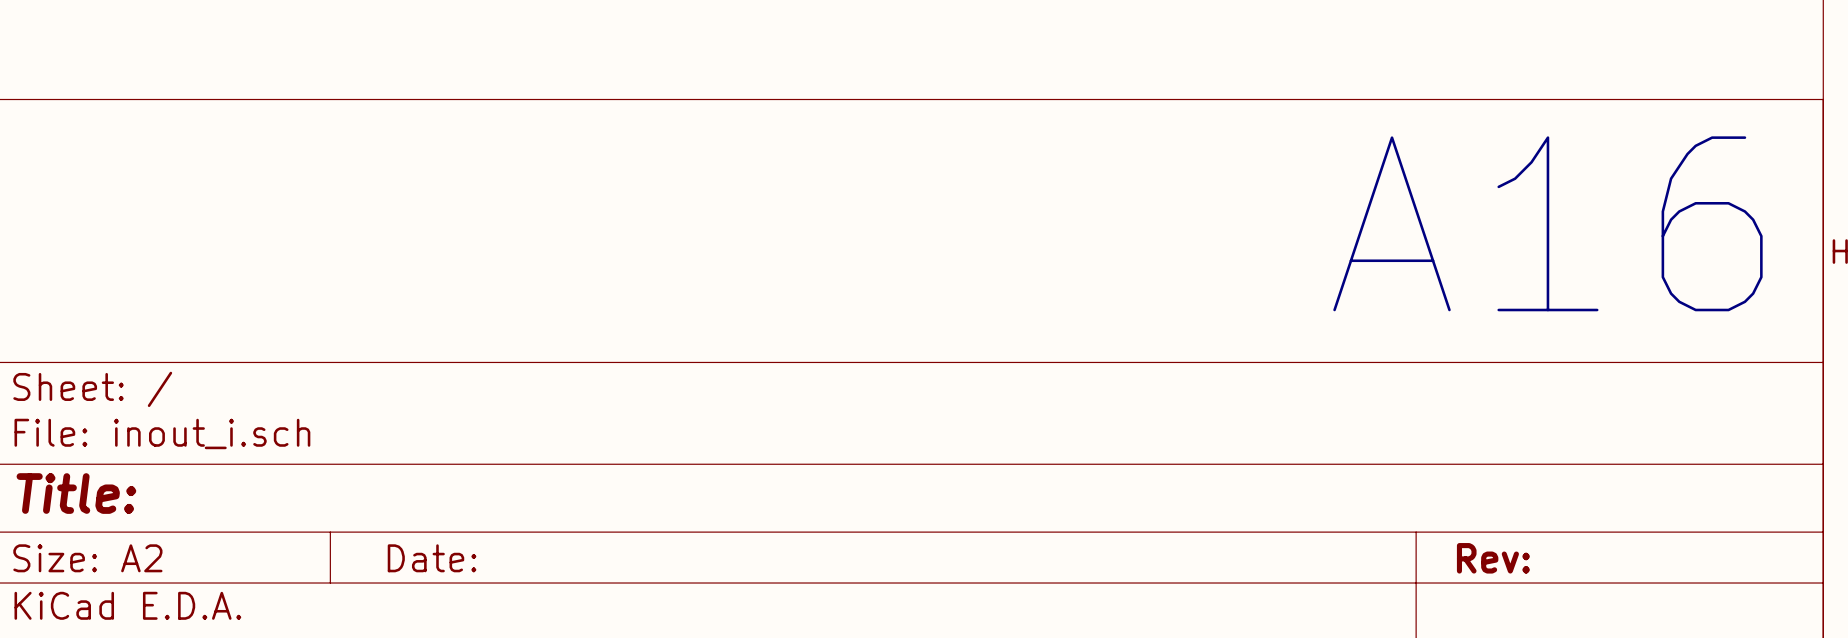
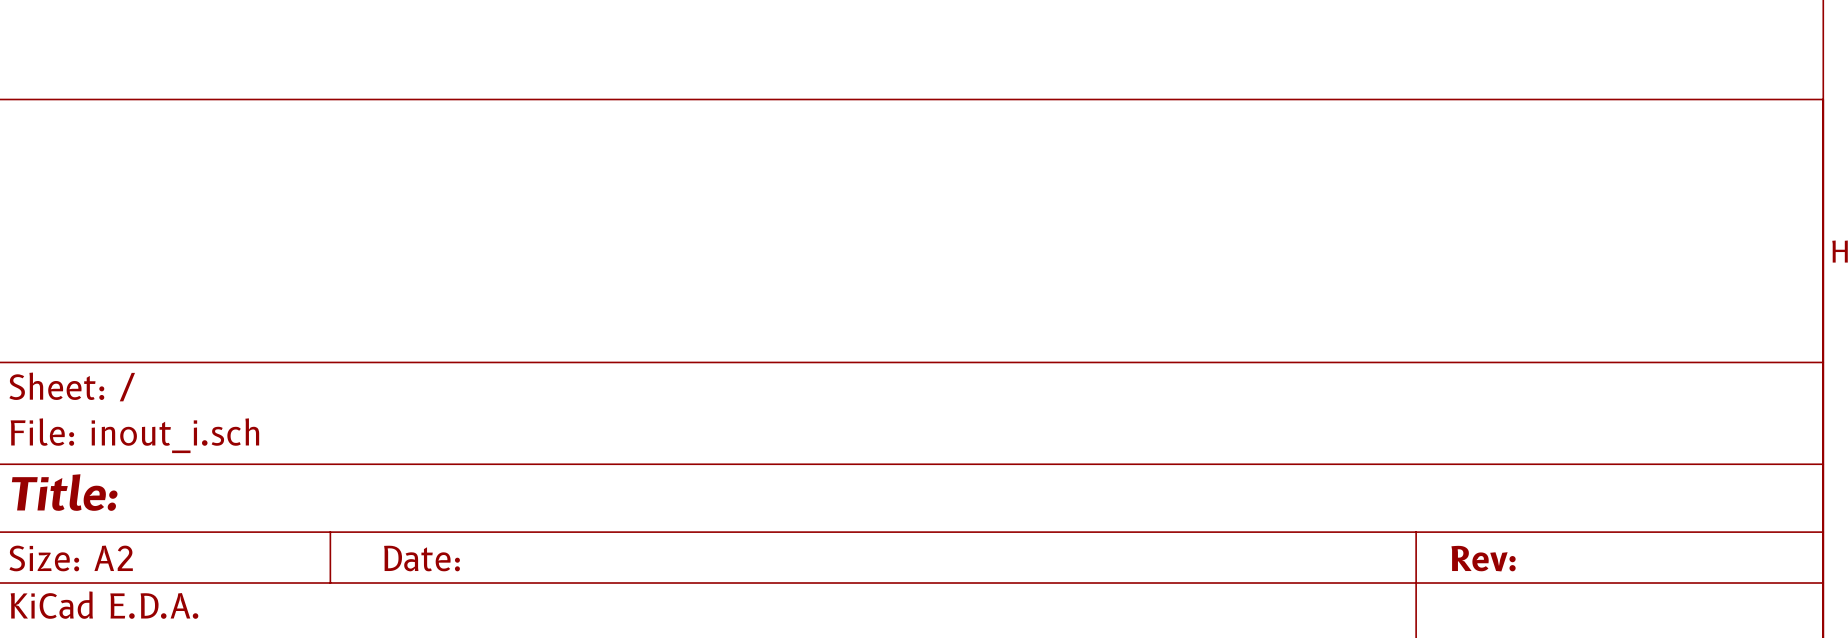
text: A16 (1547, 223) -> none

